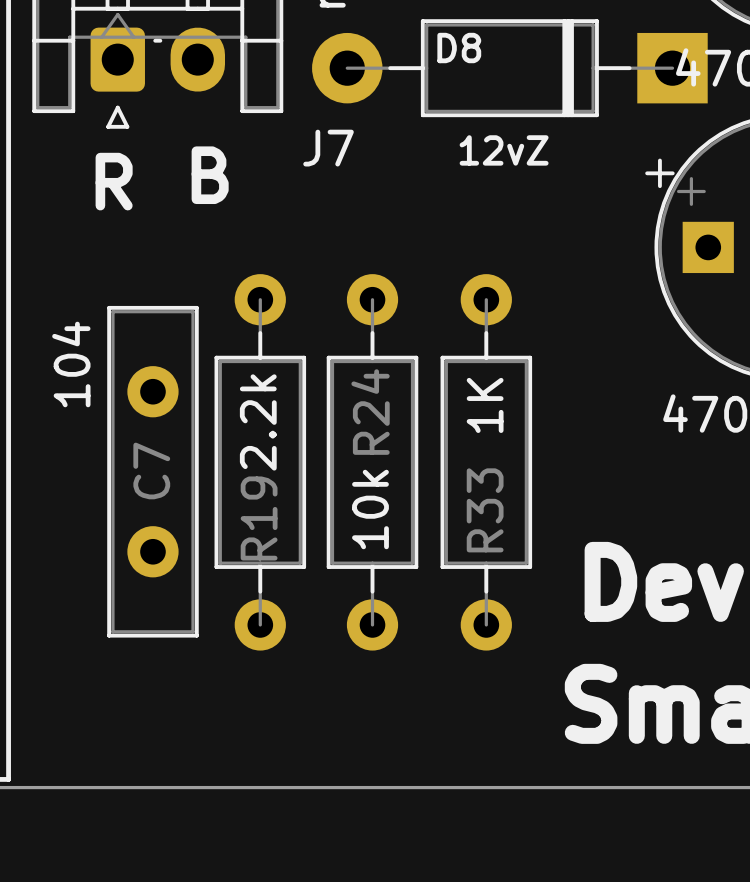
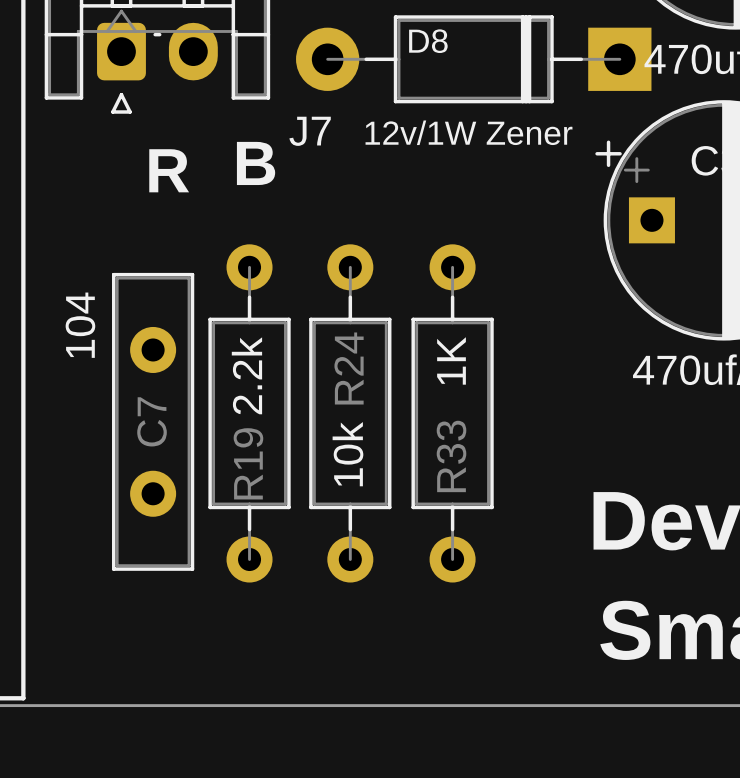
D8 value: 12vZ (504, 150) -> 12v/1W Zener (469, 132)
text position: B (210, 175) -> B (256, 163)
text position: R (114, 181) -> R (169, 170)

